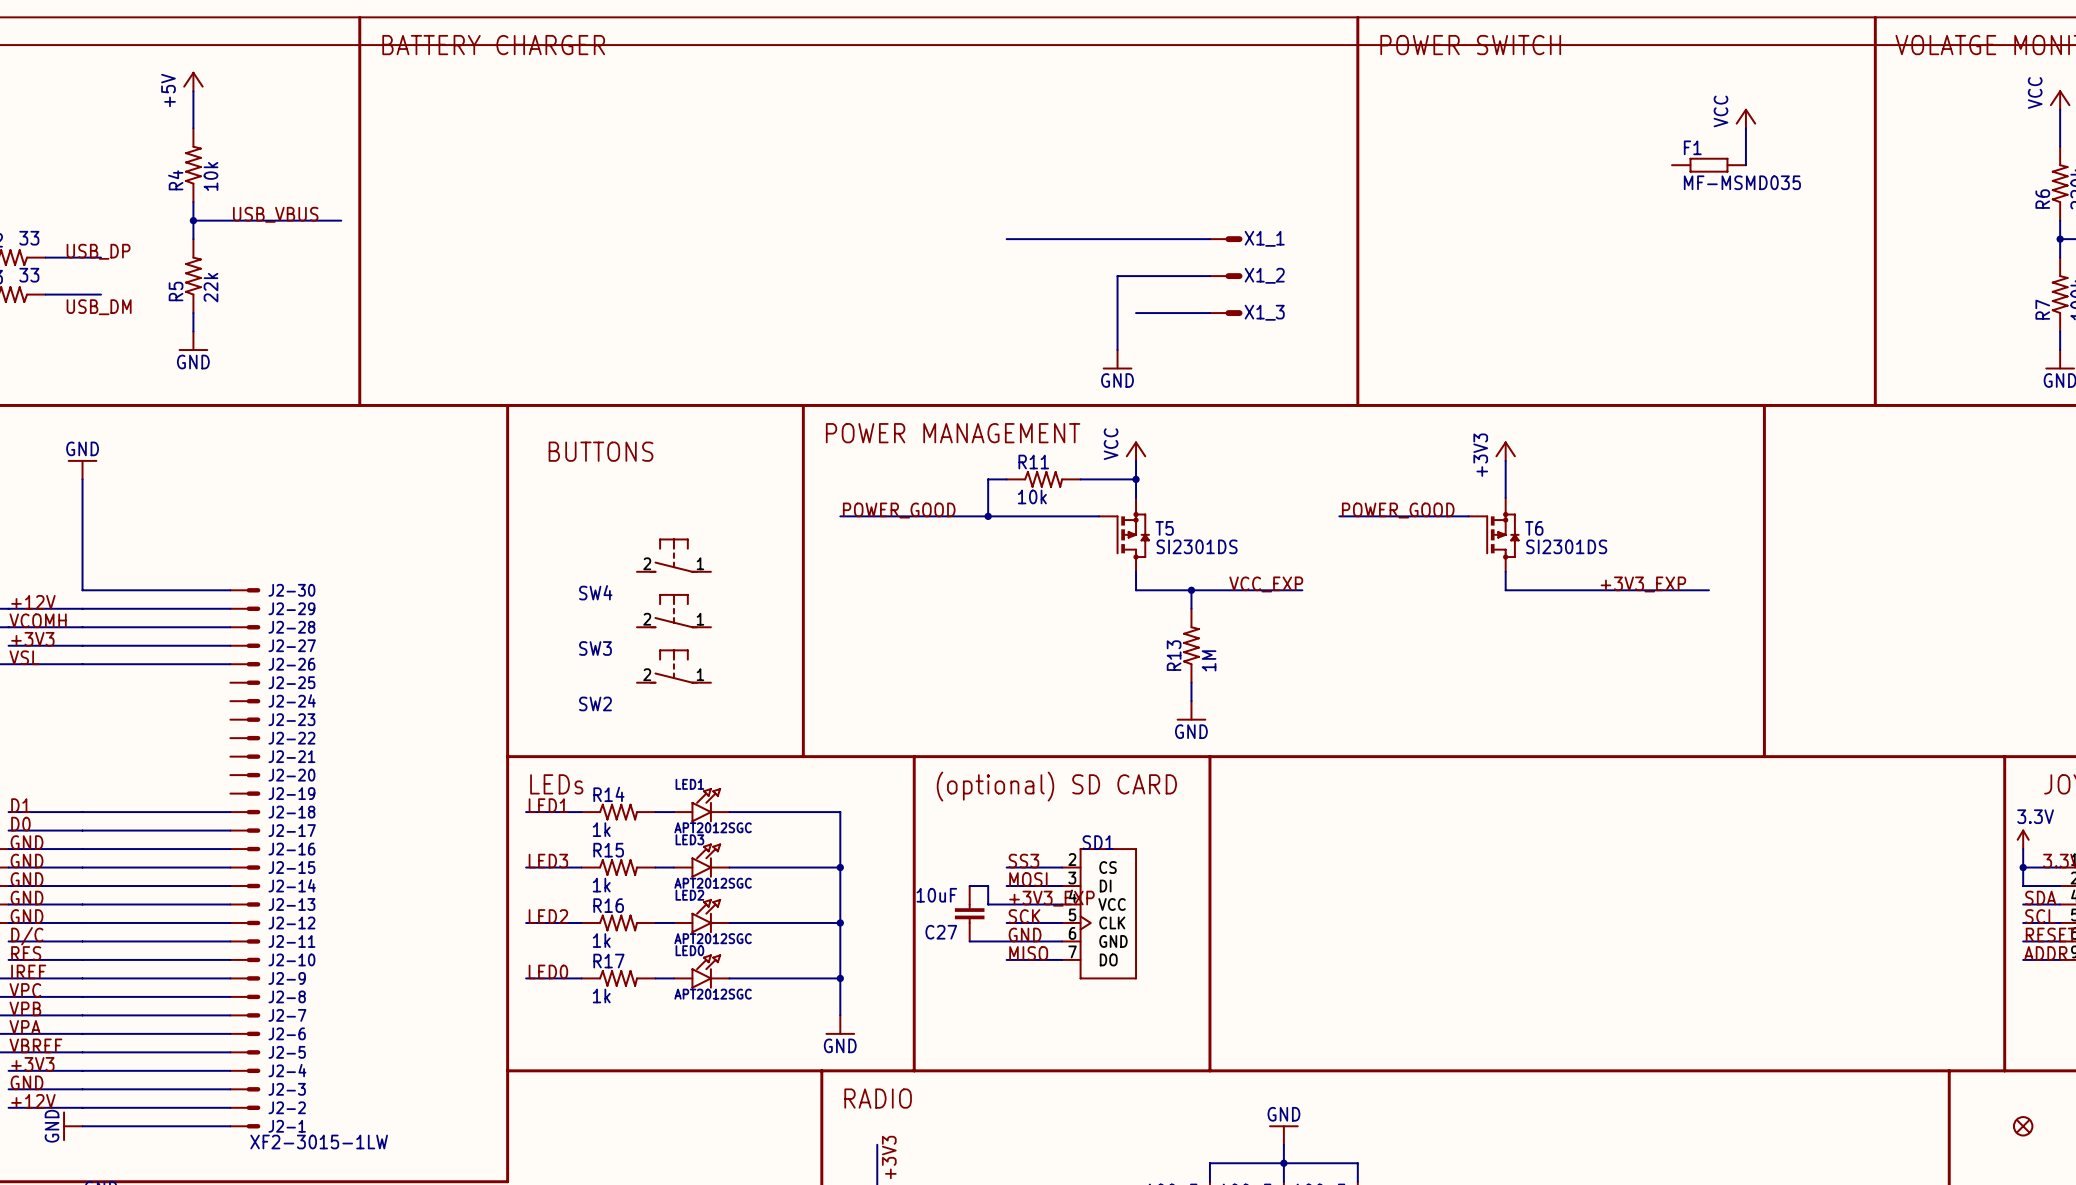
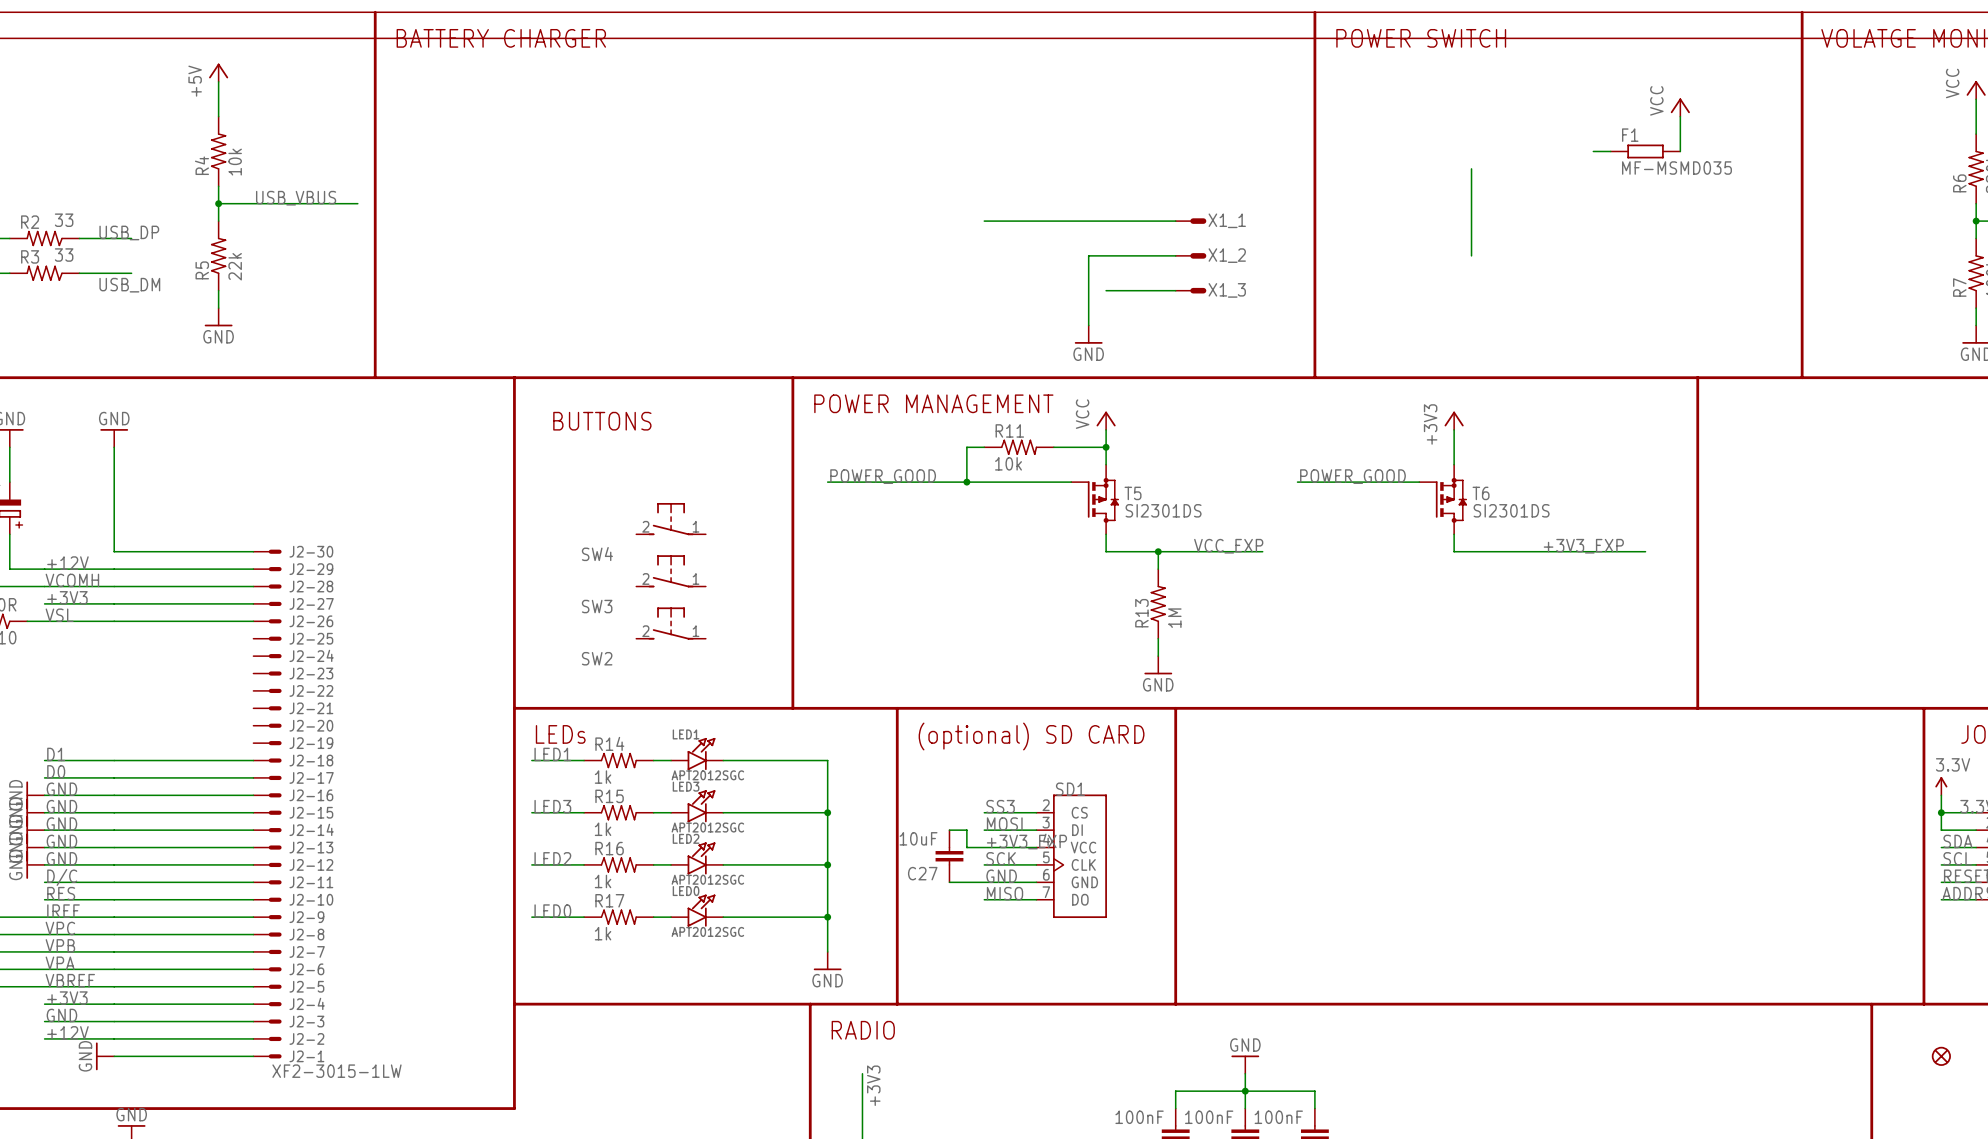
wire: none -> (1593, 151) (1610, 151)
wire: none -> (1471, 168) (1471, 255)

